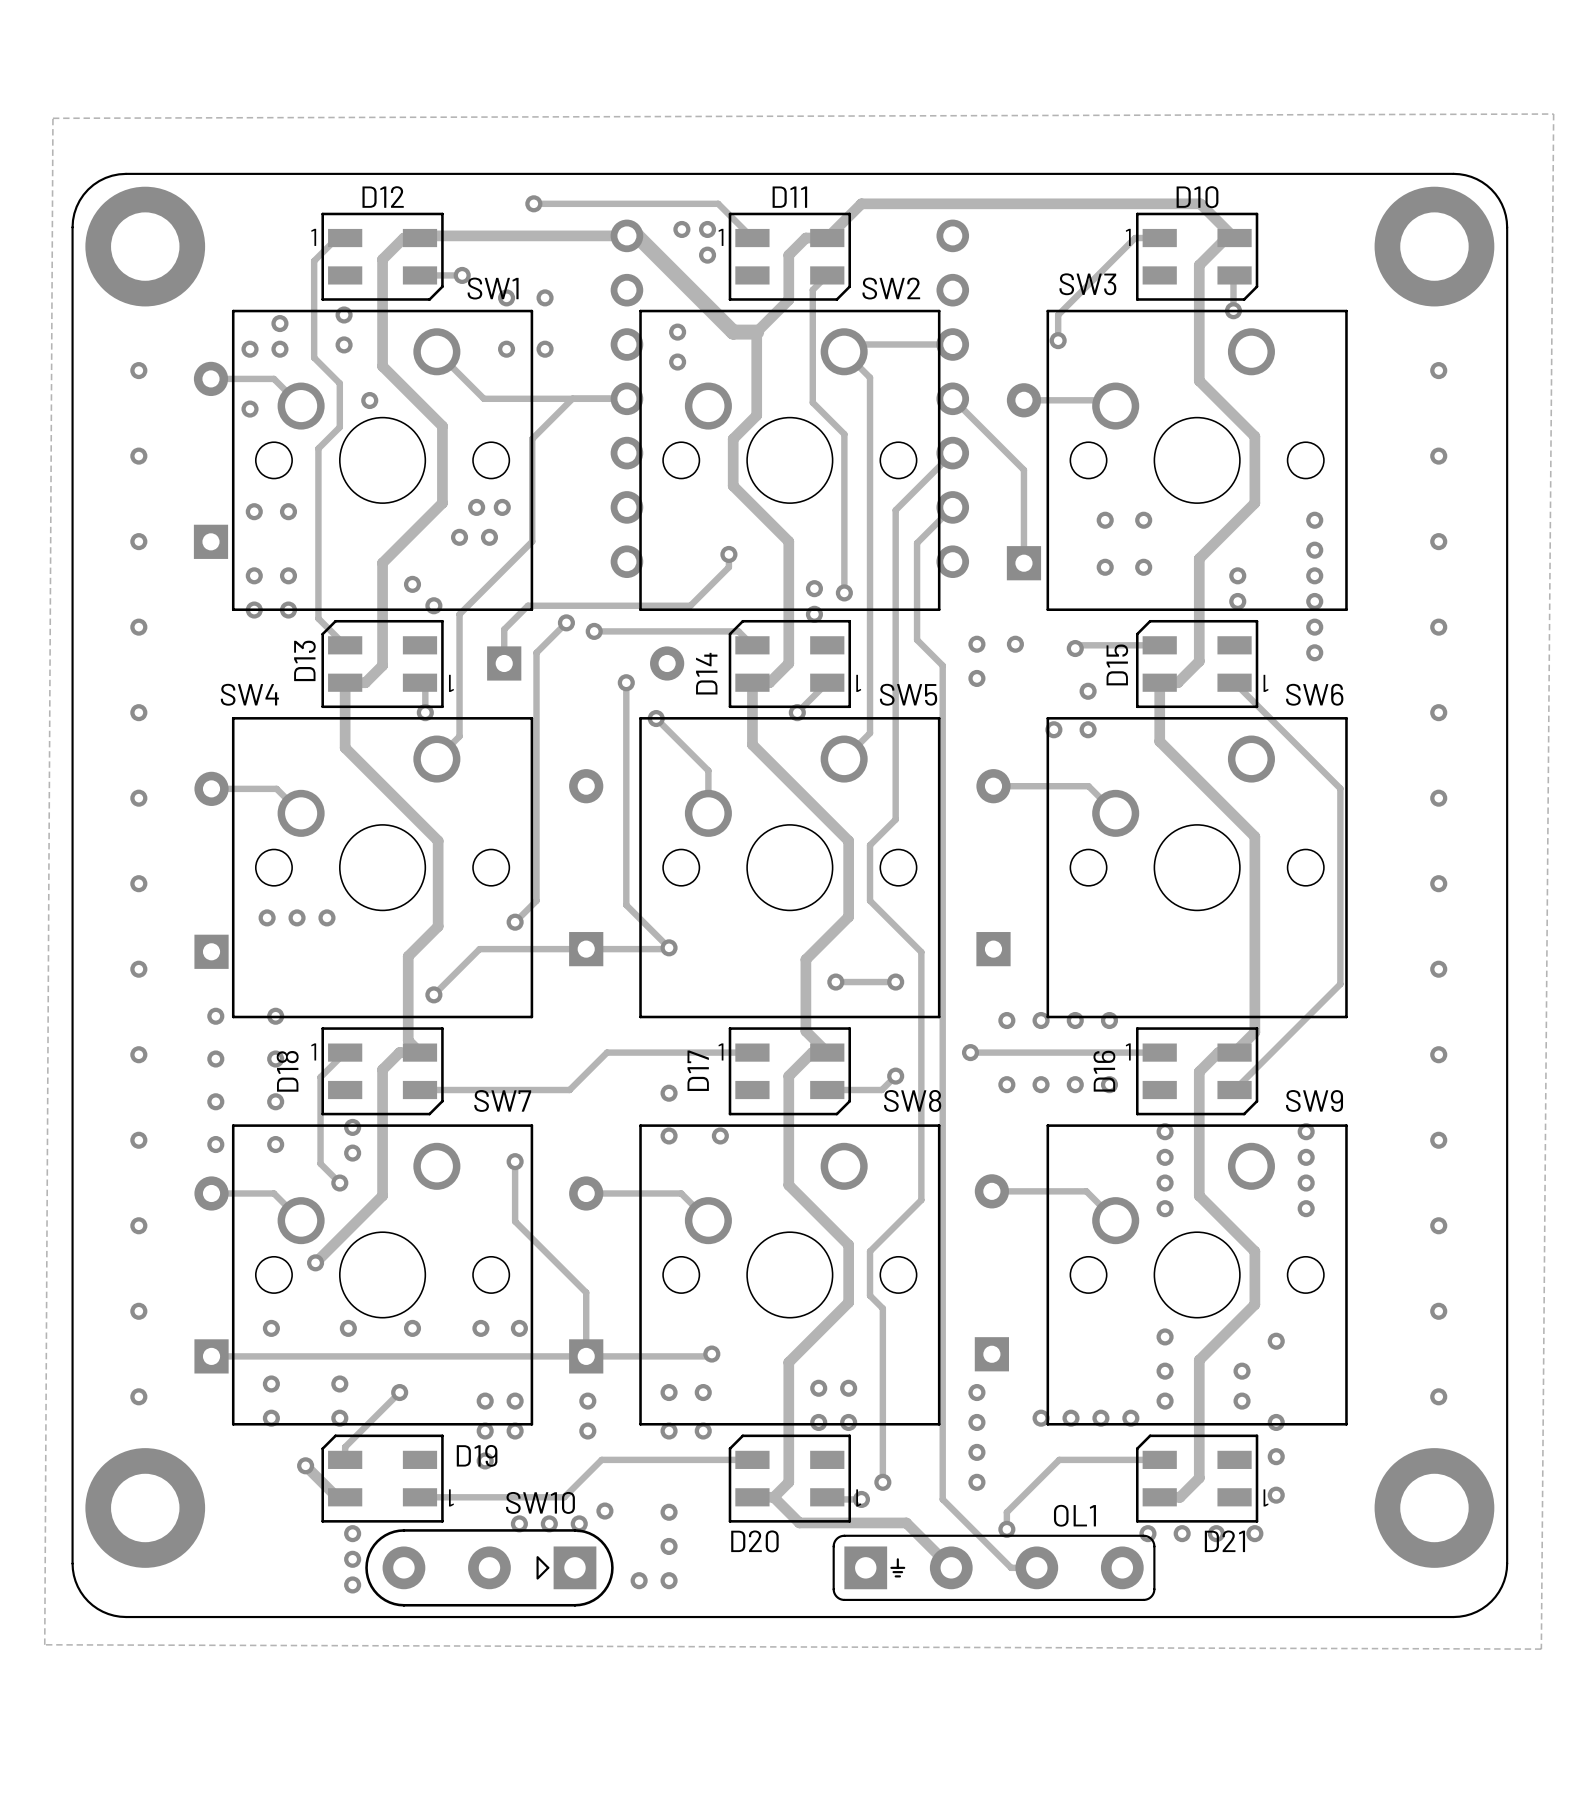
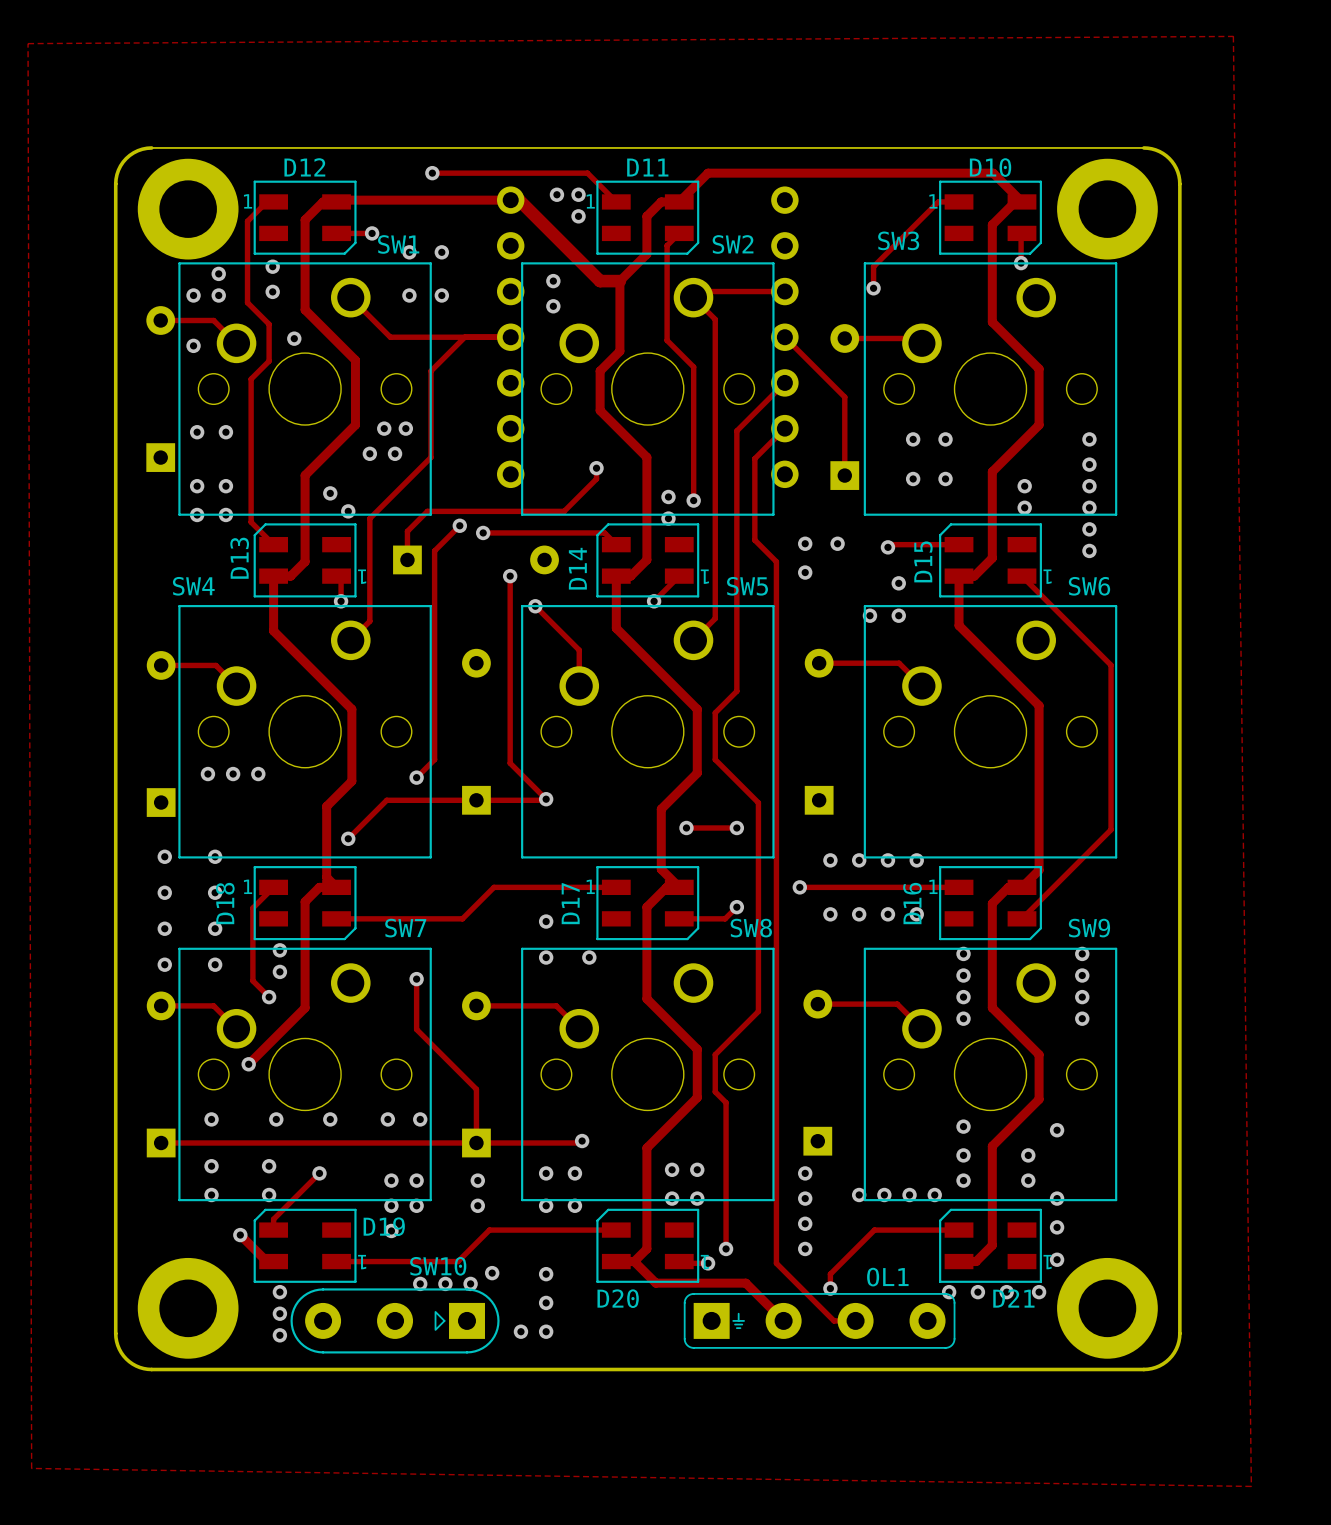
zone outline: (1553, 114) (52, 118) (44, 1644) (1541, 1649) (1553, 114) -> (1233, 36) (28, 43) (31, 1468) (1251, 1486) (1233, 36)
board edge: (200, 173) (126, 173) (105, 177) (93, 184) (83, 194) (76, 206) (72, 227) (72, 1563) (77, 1586) (88, 1601) (108, 1614) (126, 1617) (1453, 1617) (1476, 1611) (1495, 1596) (1504, 1581) (1507, 1563) (1506, 221) (1501, 204) (1495, 194) (1487, 185) (1471, 176) (1453, 173) (1379, 173) -> (151, 147) (137, 150) (126, 158) (118, 170) (115, 183) (115, 1333) (119, 1349) (126, 1358) (139, 1367) (151, 1369) (1143, 1369) (1159, 1365) (1172, 1355) (1177, 1345) (1179, 1333) (1179, 183) (1177, 172) (1169, 158) (1155, 149) (1143, 147)
part position: (145, 246) -> (188, 209)
part position: (1434, 246) -> (1107, 209)
via: (138, 370) -> none
via: (1438, 370) -> none
via: (138, 456) -> none
via: (1438, 456) -> none
via: (138, 541) -> none
via: (1438, 541) -> none
via: (138, 627) -> none
via: (1438, 627) -> none
via: (138, 712) -> none
via: (1438, 712) -> none
via: (138, 798) -> none
via: (1438, 798) -> none
via: (138, 883) -> none
via: (1438, 883) -> none
via: (138, 969) -> none
via: (1438, 969) -> none
via: (138, 1054) -> none
via: (1438, 1054) -> none
via: (138, 1140) -> none
via: (1438, 1140) -> none
via: (138, 1225) -> none
via: (1438, 1225) -> none
via: (138, 1311) -> none
via: (1438, 1311) -> none
via: (138, 1396) -> none
via: (1438, 1396) -> none
part position: (145, 1507) -> (188, 1308)
part position: (1434, 1507) -> (1107, 1308)

